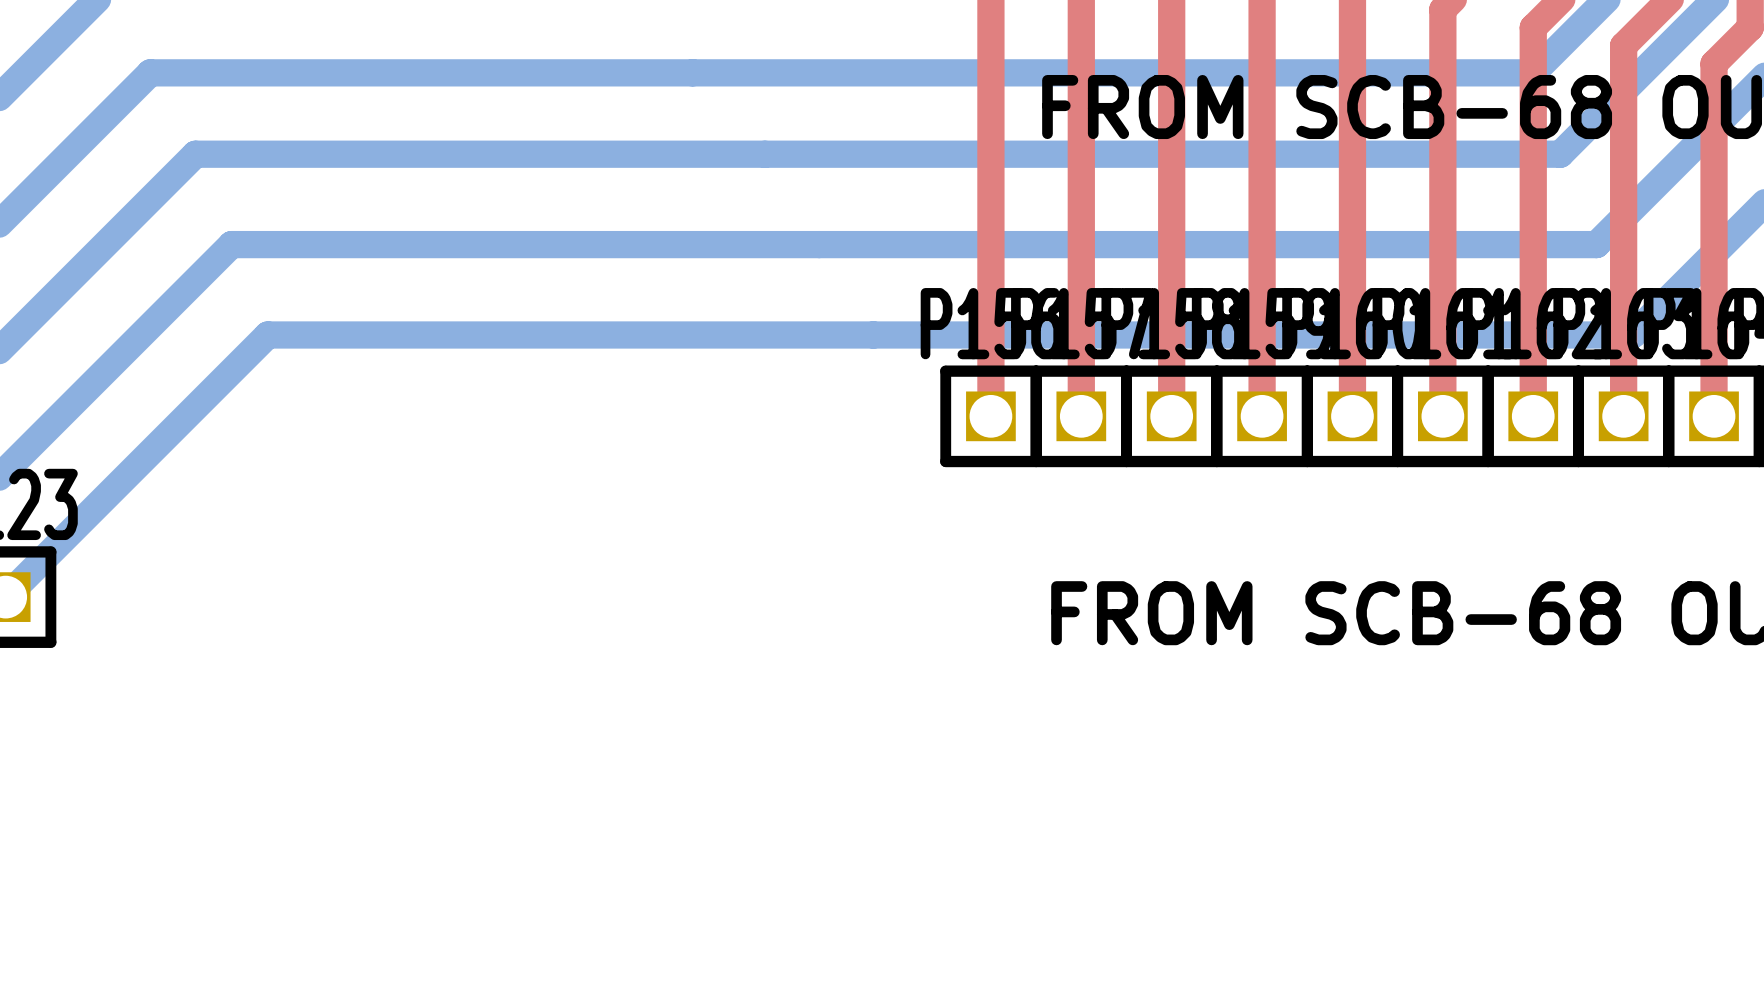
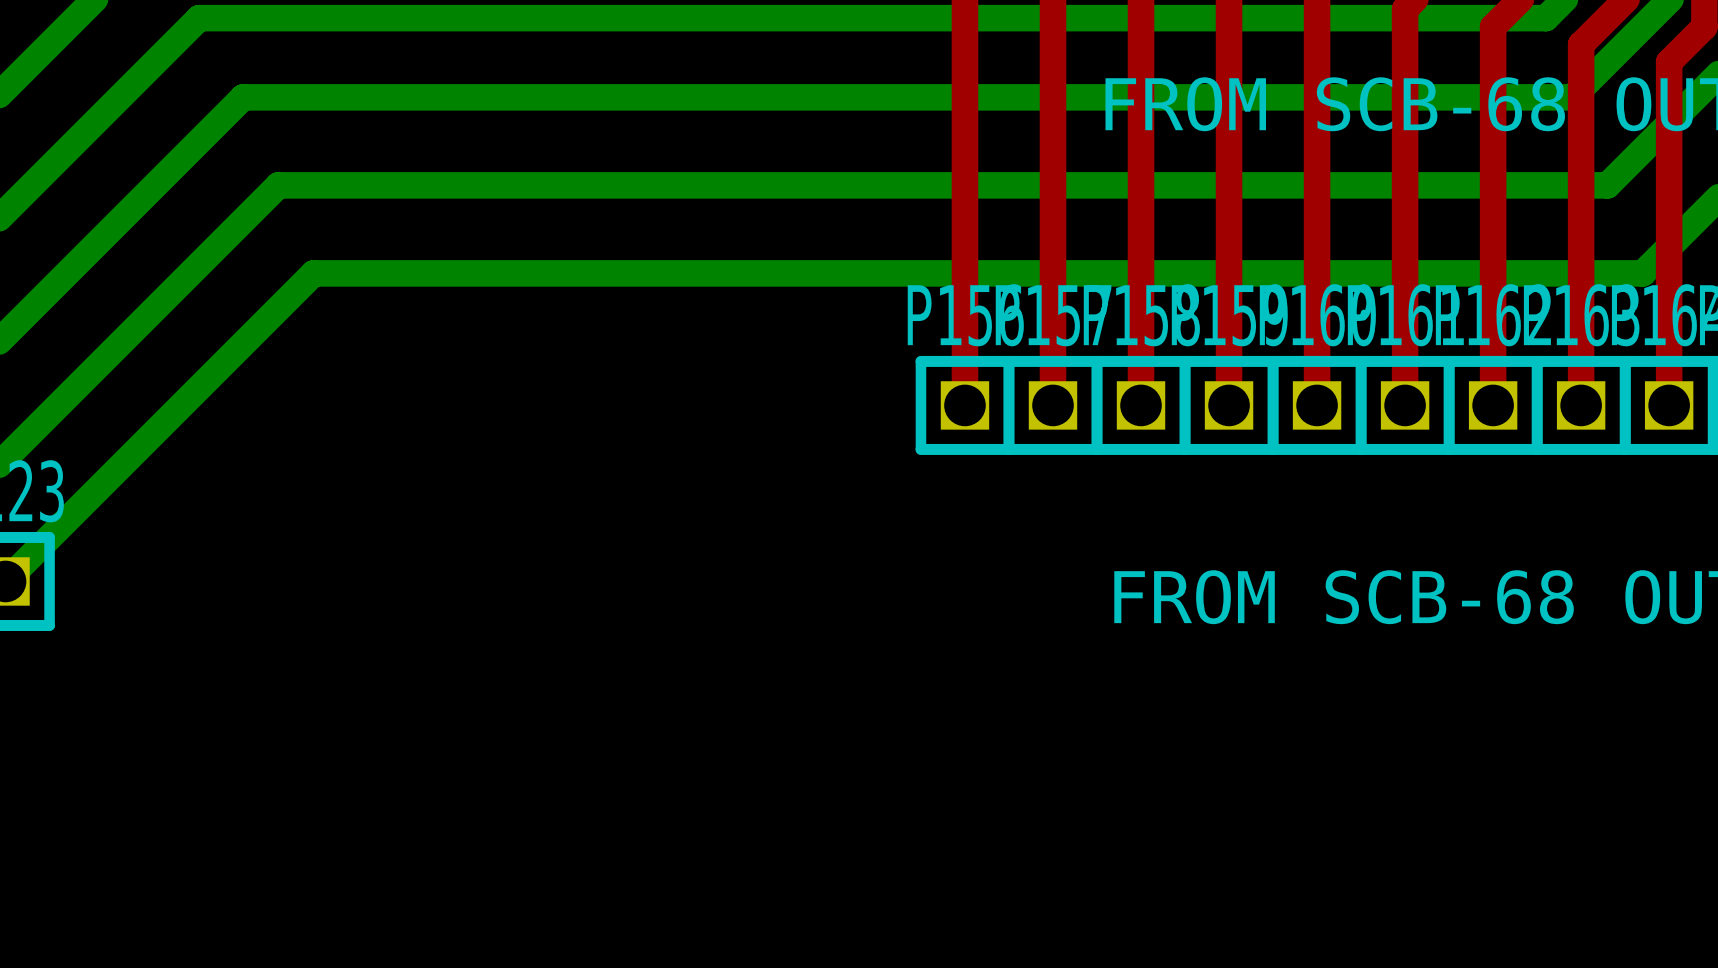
bottom track: (1587, 18) (1533, 72) (150, 72) -> (1545, 18) (199, 18) (146, 70)
bottom track: (1614, 99) (1560, 154) (195, 154) -> (1572, 97) (243, 97) (190, 150)
bottom track: (1650, 190) (1596, 244) (231, 244) -> (1607, 185) (278, 185) (225, 238)
bottom track: (1686, 280) (1632, 334) (267, 334) -> (1642, 273) (313, 273) (260, 326)

